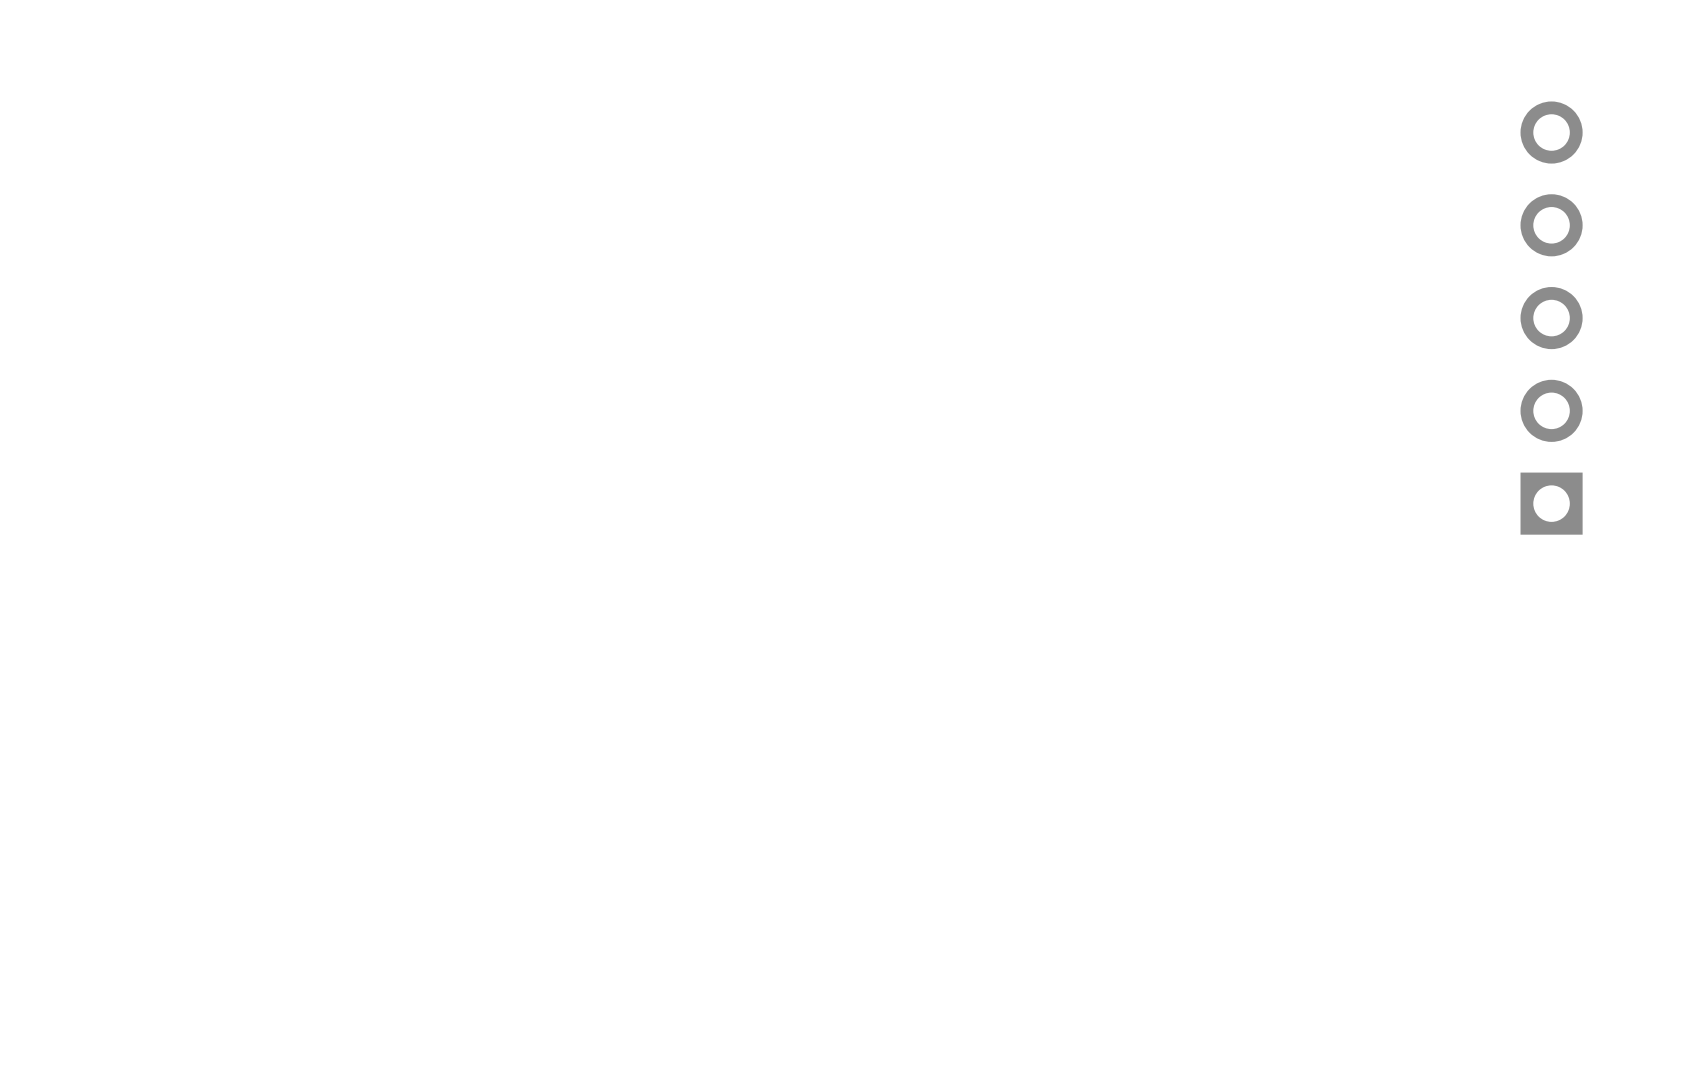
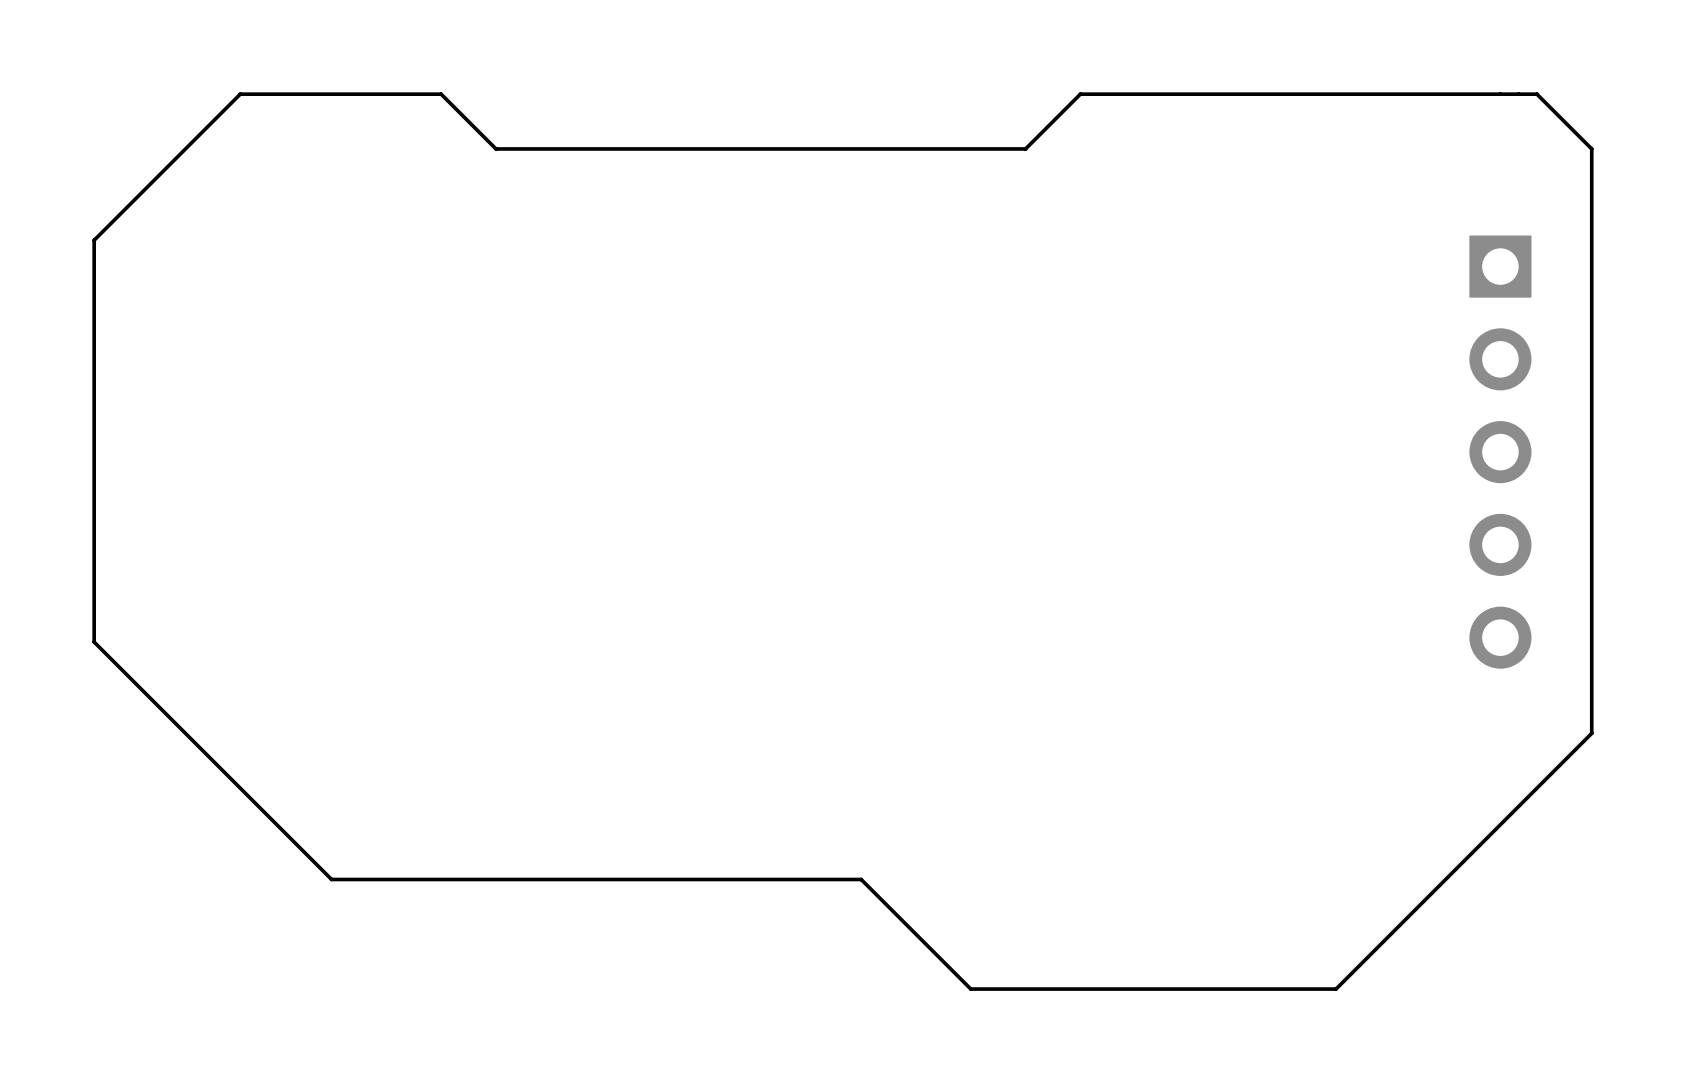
board edge: none -> (1536, 94) (1080, 94) (1025, 148) (495, 148) (441, 94) (240, 94) (94, 240) (94, 642) (331, 879) (861, 879) (970, 989) (1336, 989) (1591, 733) (1591, 148) (1536, 94)
part rotation: 0° (1551, 318) -> 180° (1500, 452)

